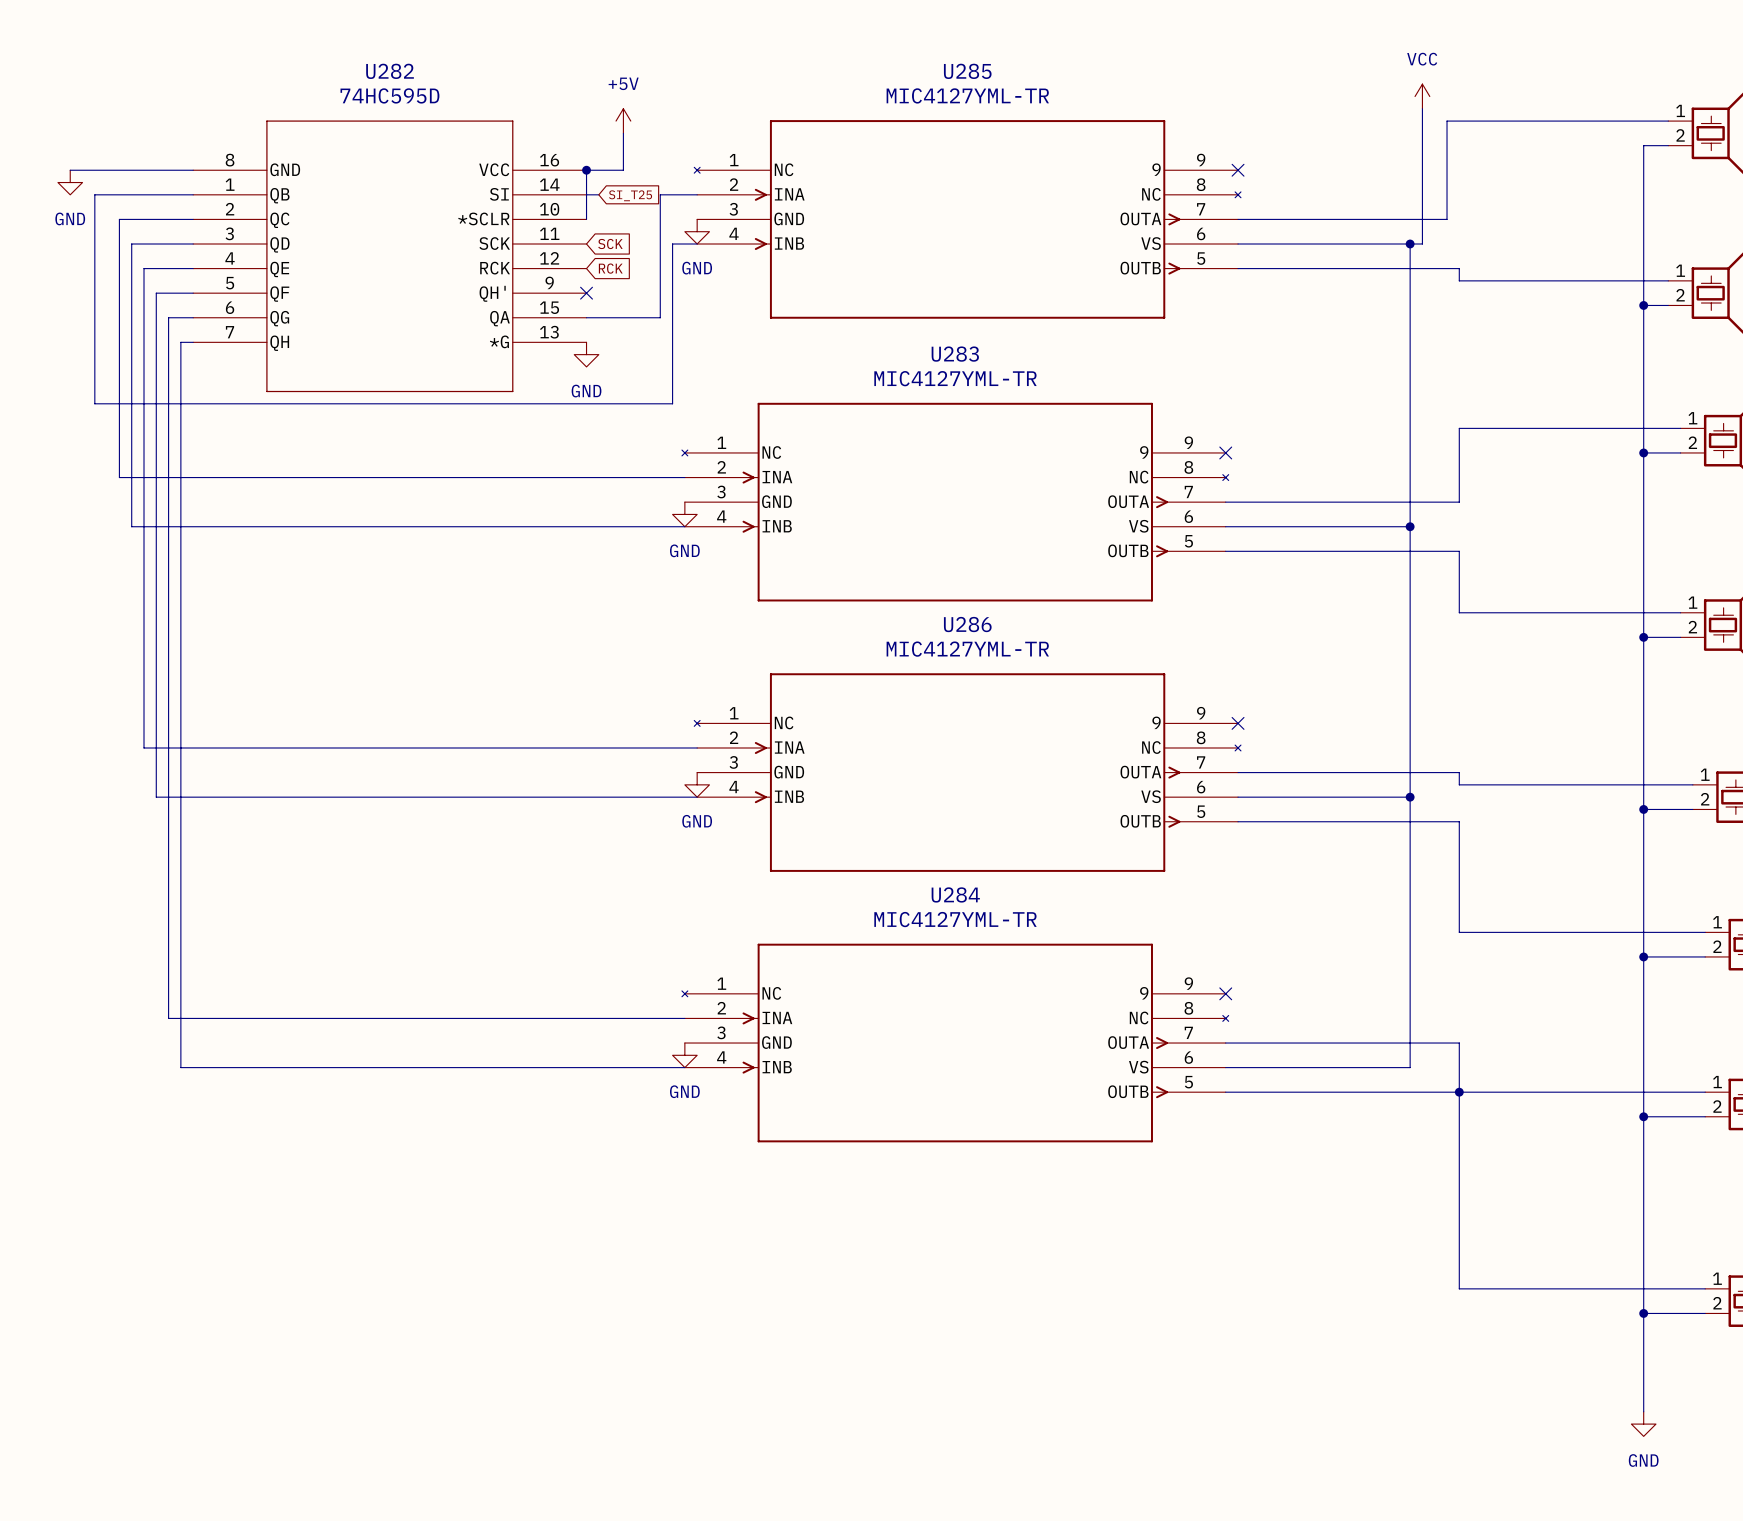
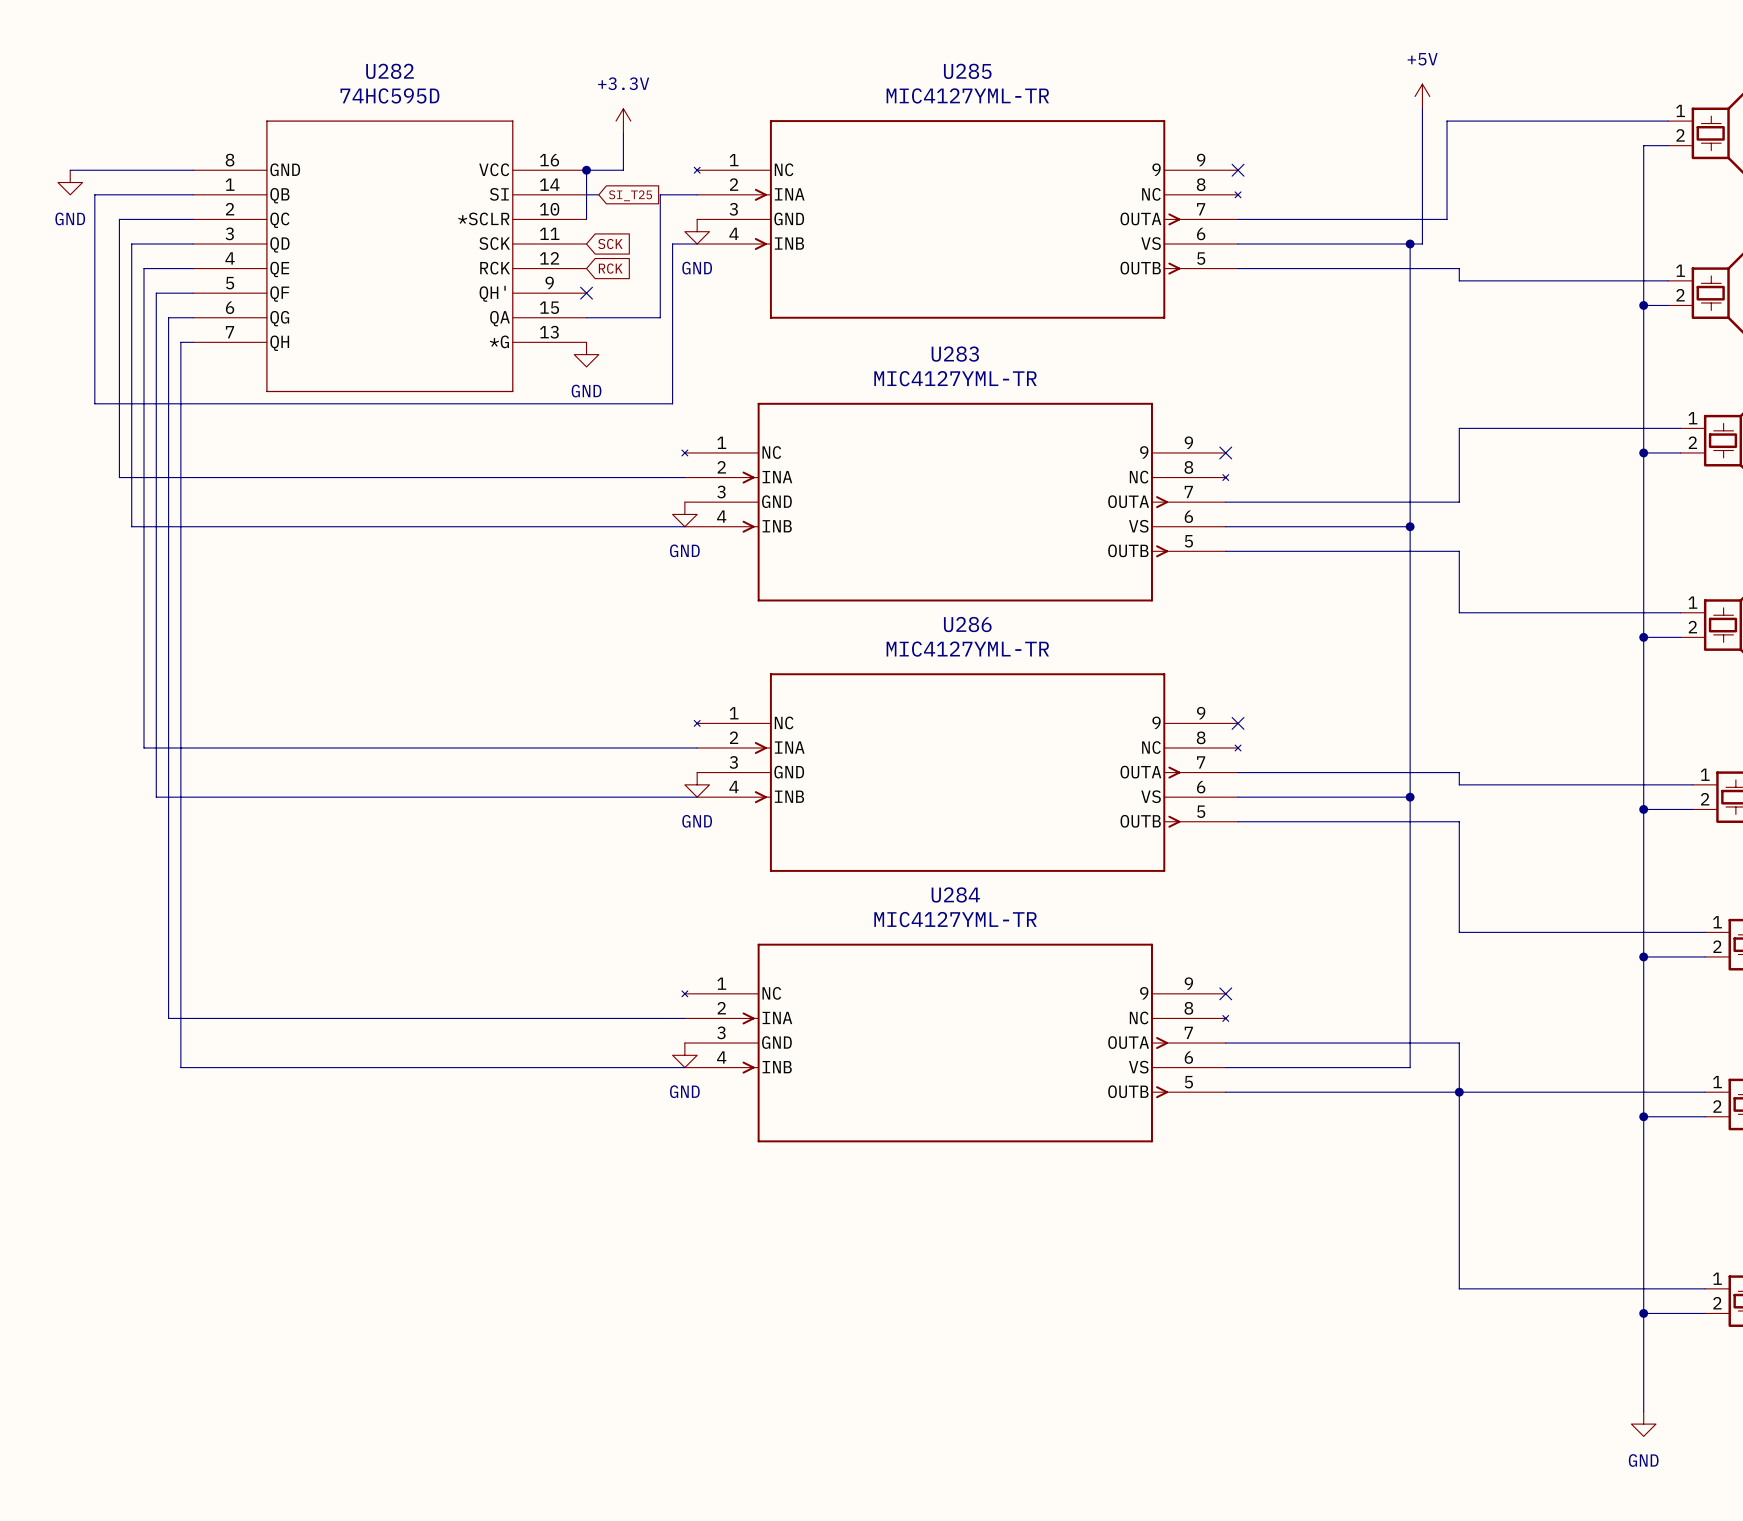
power symbol: VCC (1422, 96) -> +5V (1422, 96)
power symbol: +5V (623, 121) -> +3.3V (623, 121)

